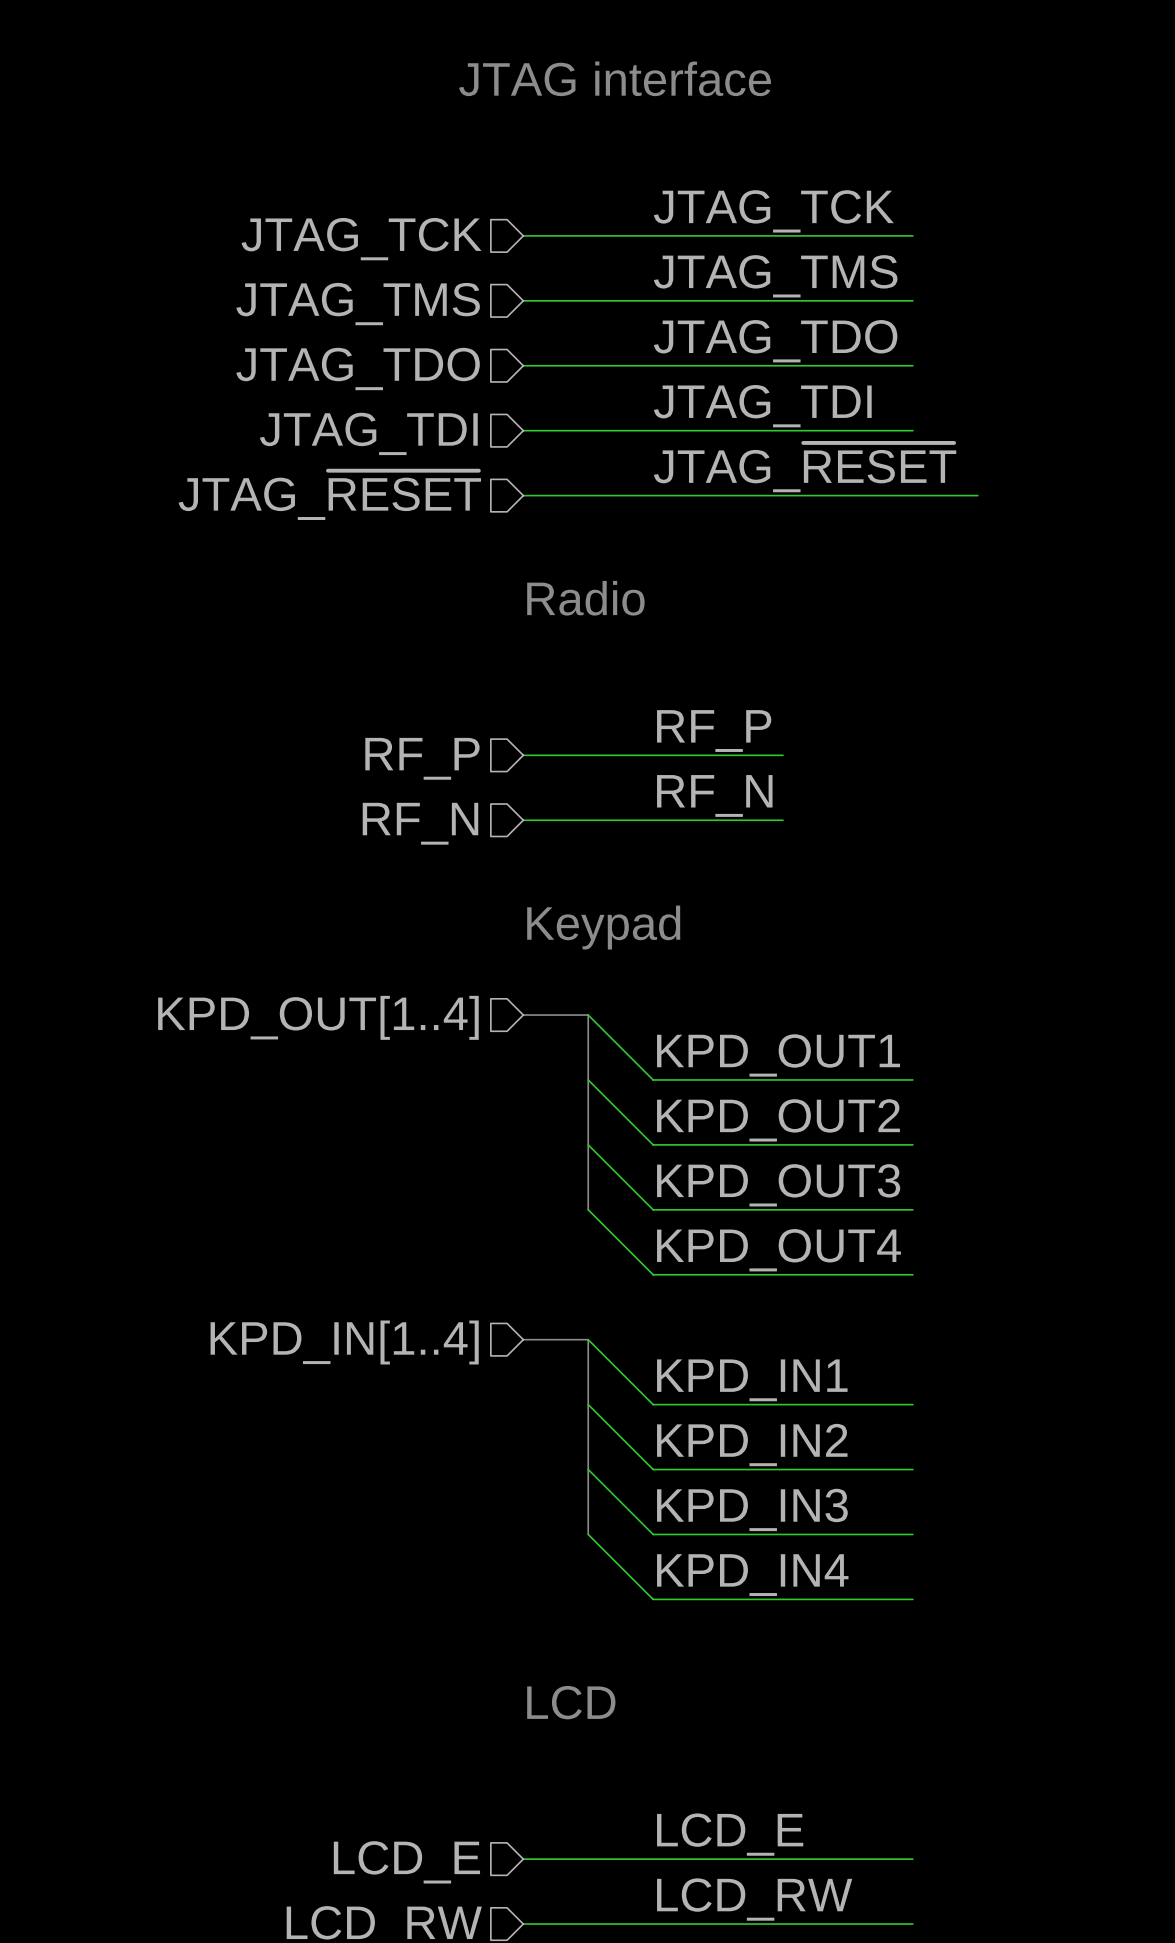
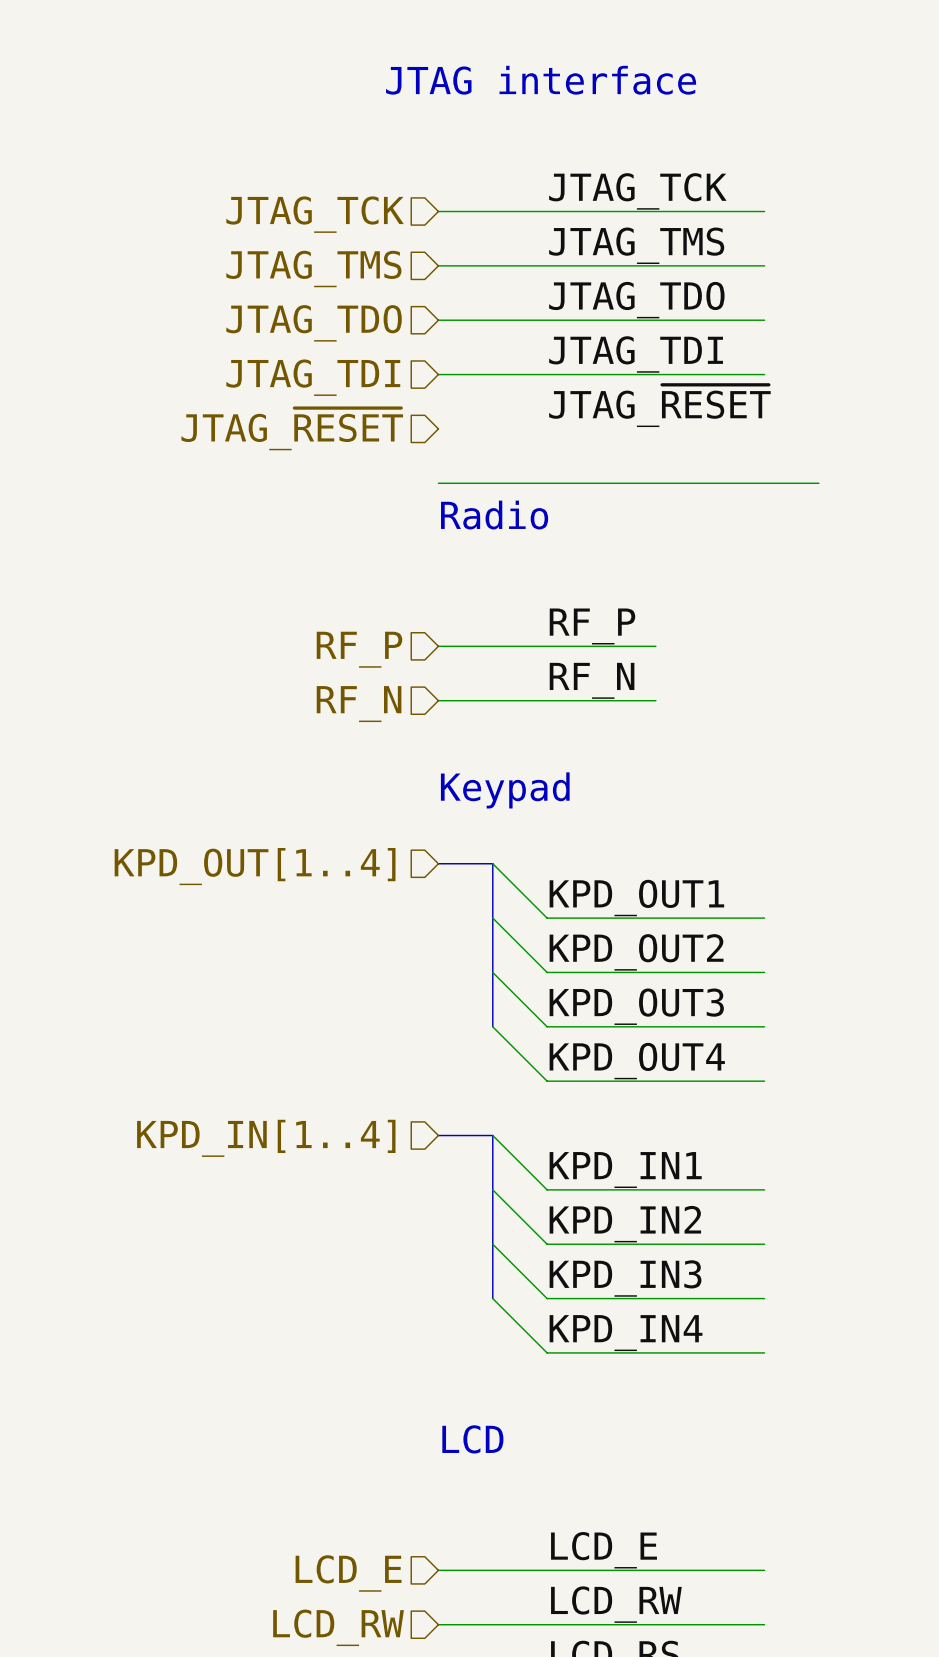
wire: (523, 495) (977, 495) -> (438, 483) (818, 483)

